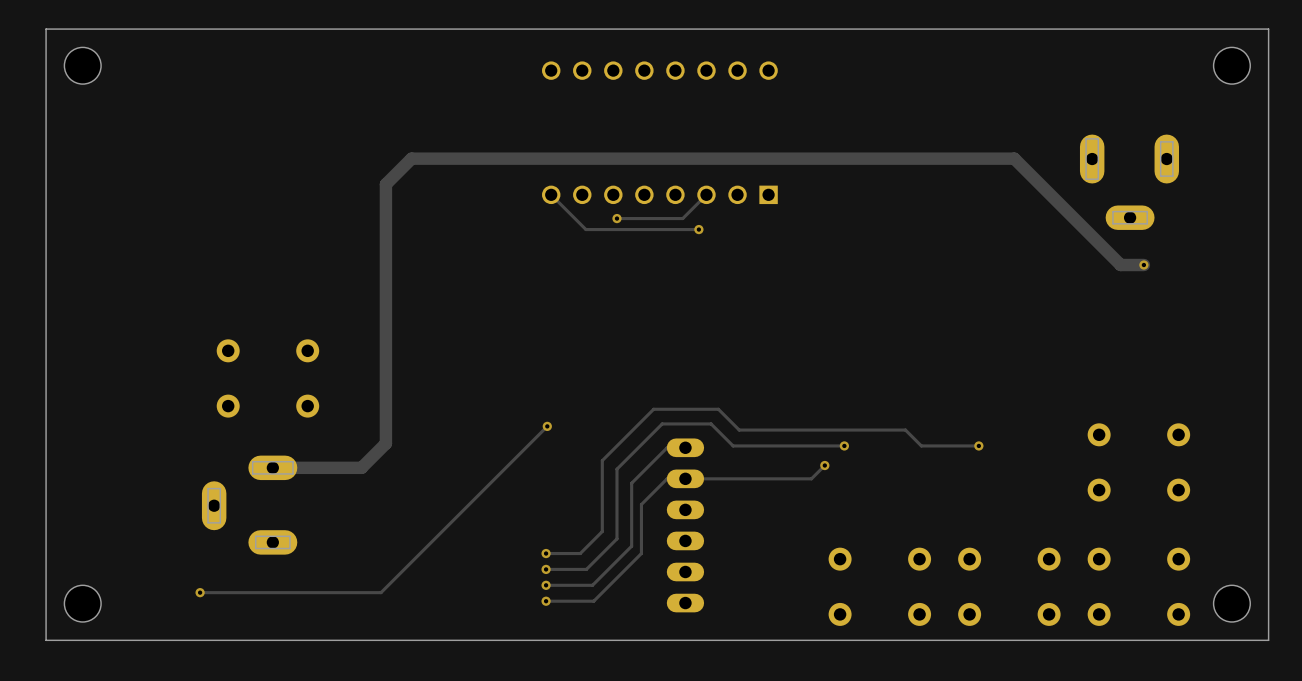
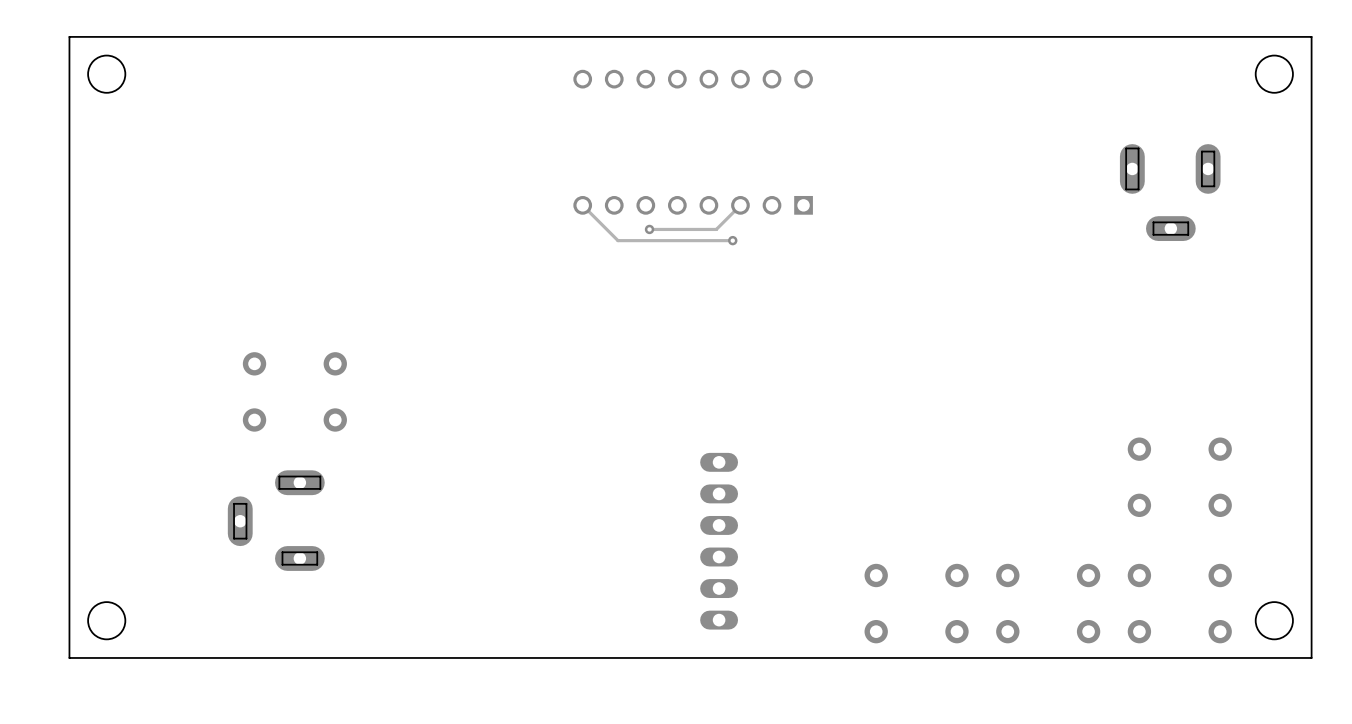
track: (1143, 265) (1120, 265) (1014, 158) (411, 158) (385, 184) (385, 443) (361, 467) (272, 467) -> none
via: (1143, 265) -> none
track: (547, 426) (381, 592) (200, 592) -> none
via: (547, 426) -> none
track: (844, 445) (733, 445) (711, 423) (662, 423) (616, 469) (616, 538) (586, 569) (546, 569) -> none
via: (844, 445) -> none
track: (978, 445) (921, 445) (905, 430) (739, 430) (718, 409) (653, 409) (602, 460) (602, 531) (580, 553) (546, 553) -> none
via: (978, 445) -> none
track: (685, 447) (667, 447) (631, 483) (631, 546) (592, 585) (546, 585) -> none
track: (824, 465) (811, 478) (667, 478) (641, 504) (641, 553) (593, 601) (546, 601) -> none
via: (824, 465) -> none
via: (546, 553) -> none
via: (546, 569) -> none
via: (546, 585) -> none
via: (200, 592) -> none
via: (546, 601) -> none

